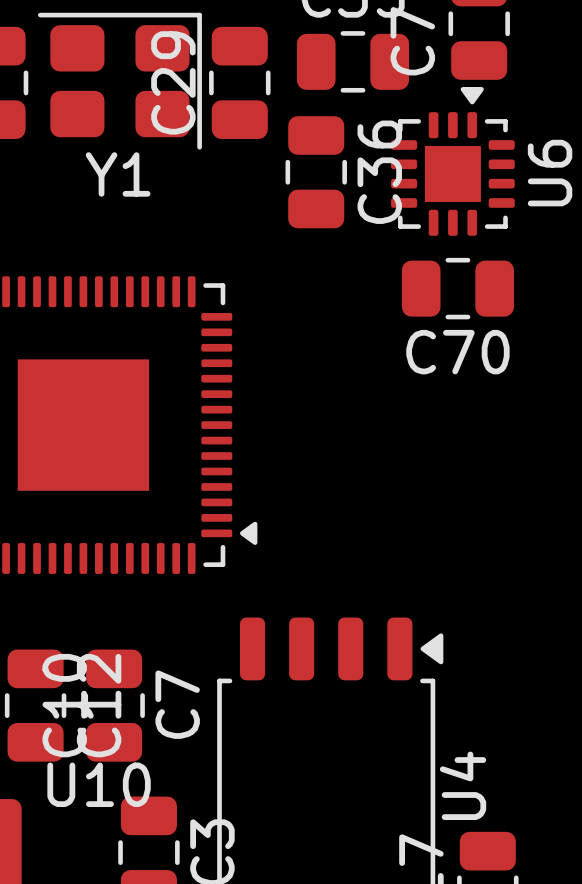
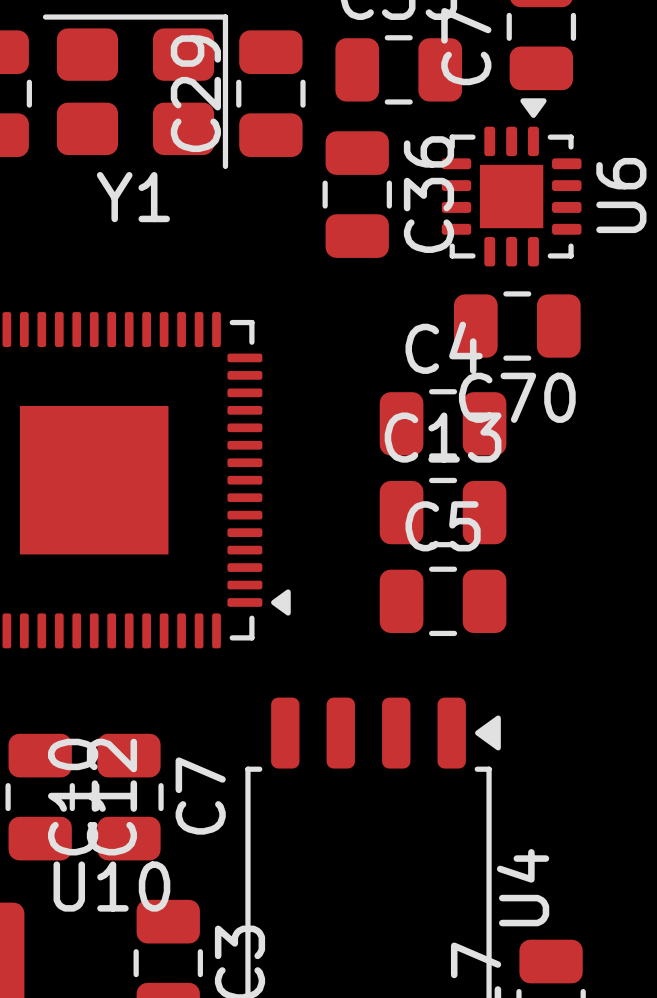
C4: none -> (443, 423)
C13: none -> (443, 512)
C5: none -> (443, 601)

